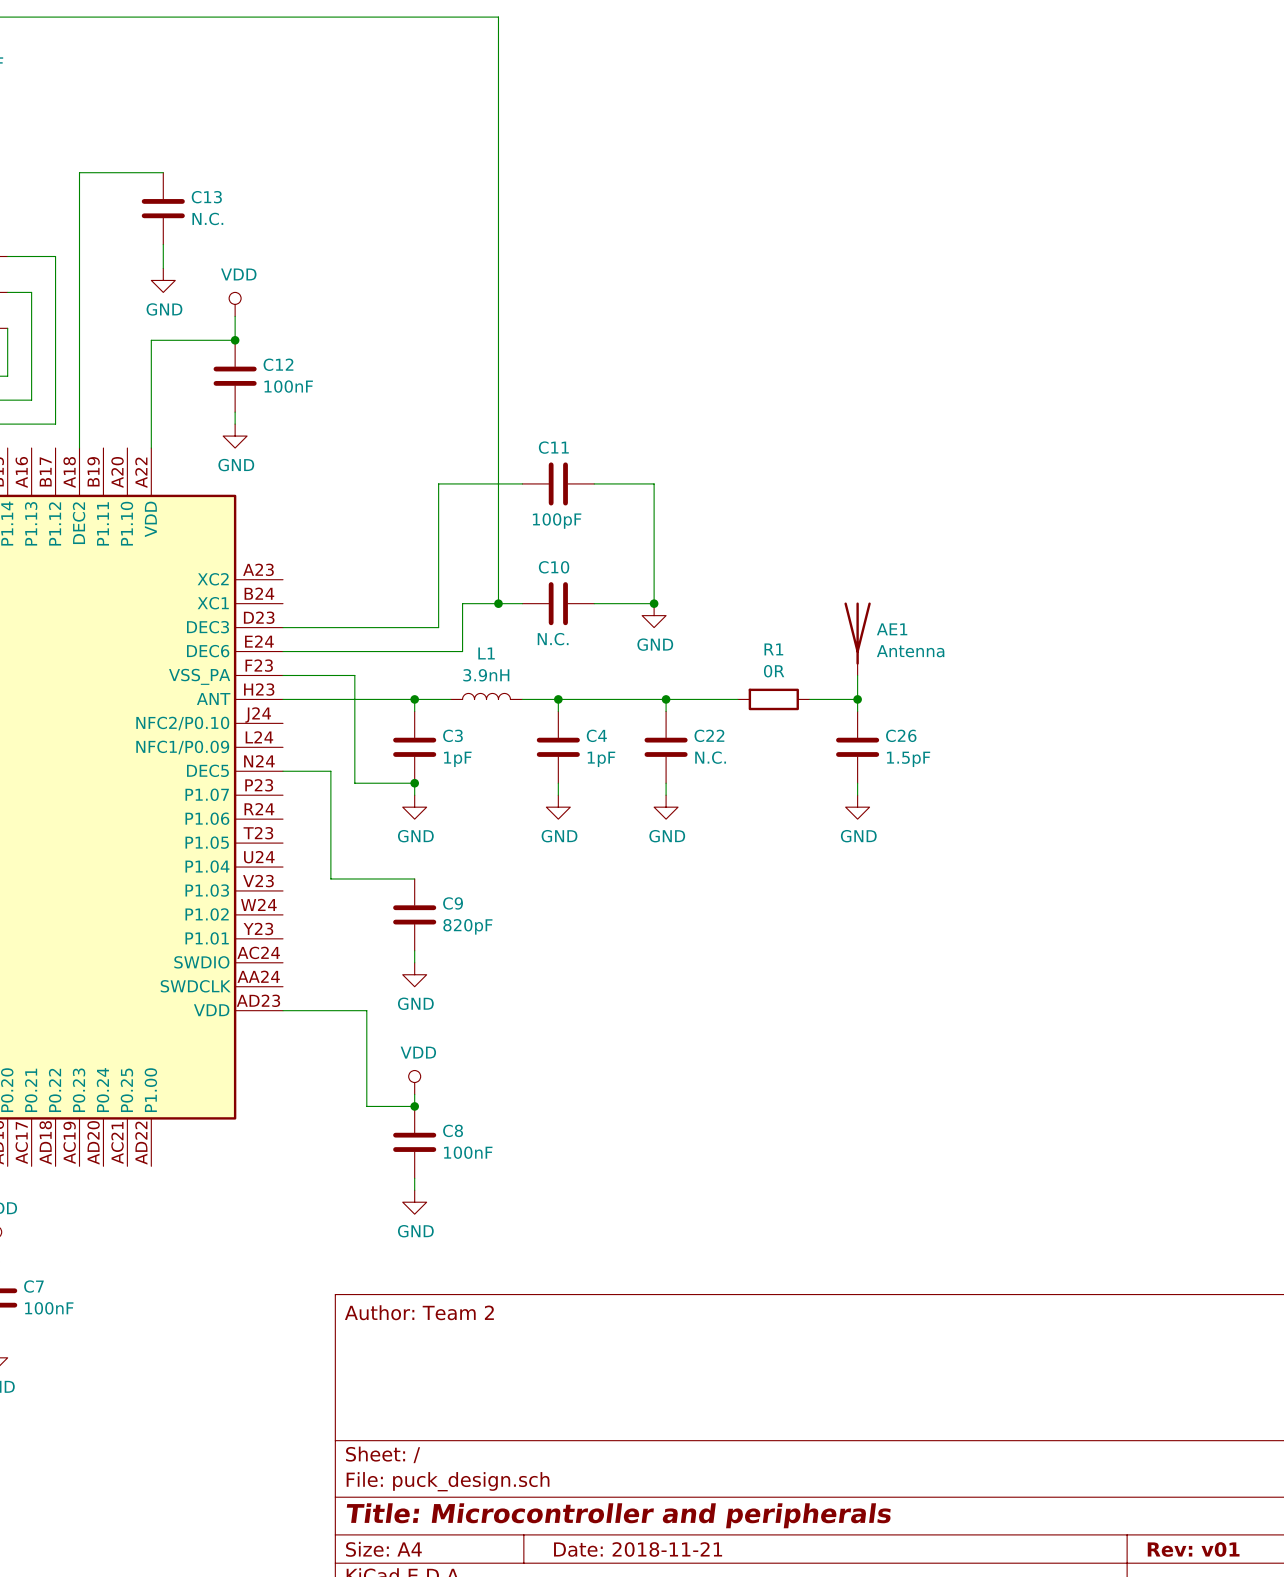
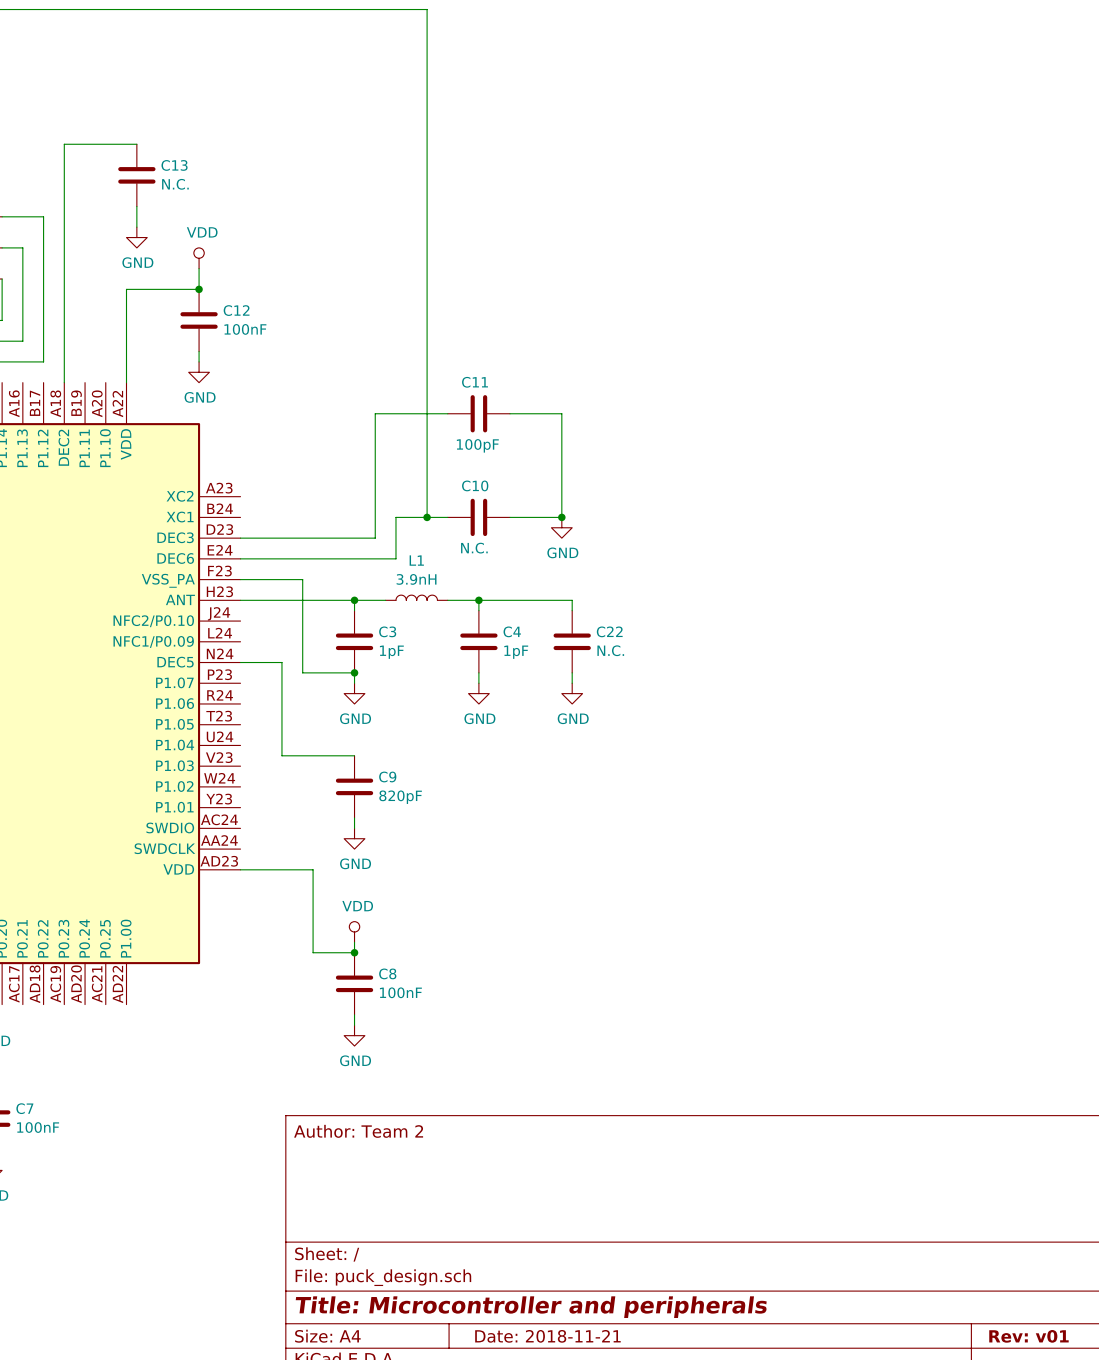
AE1: Antenna (857, 638) -> none
wire: (857, 675) (857, 711) -> none
wire: (666, 699) (737, 699) -> none
junction: (666, 699) -> none
R1: 0R (773, 699) -> none
wire: (809, 699) (857, 699) -> none
junction: (857, 699) -> none
C26: 1.5pF (857, 747) -> none
wire: (857, 783) (857, 795) -> none
power symbol: GND (857, 807) -> none

